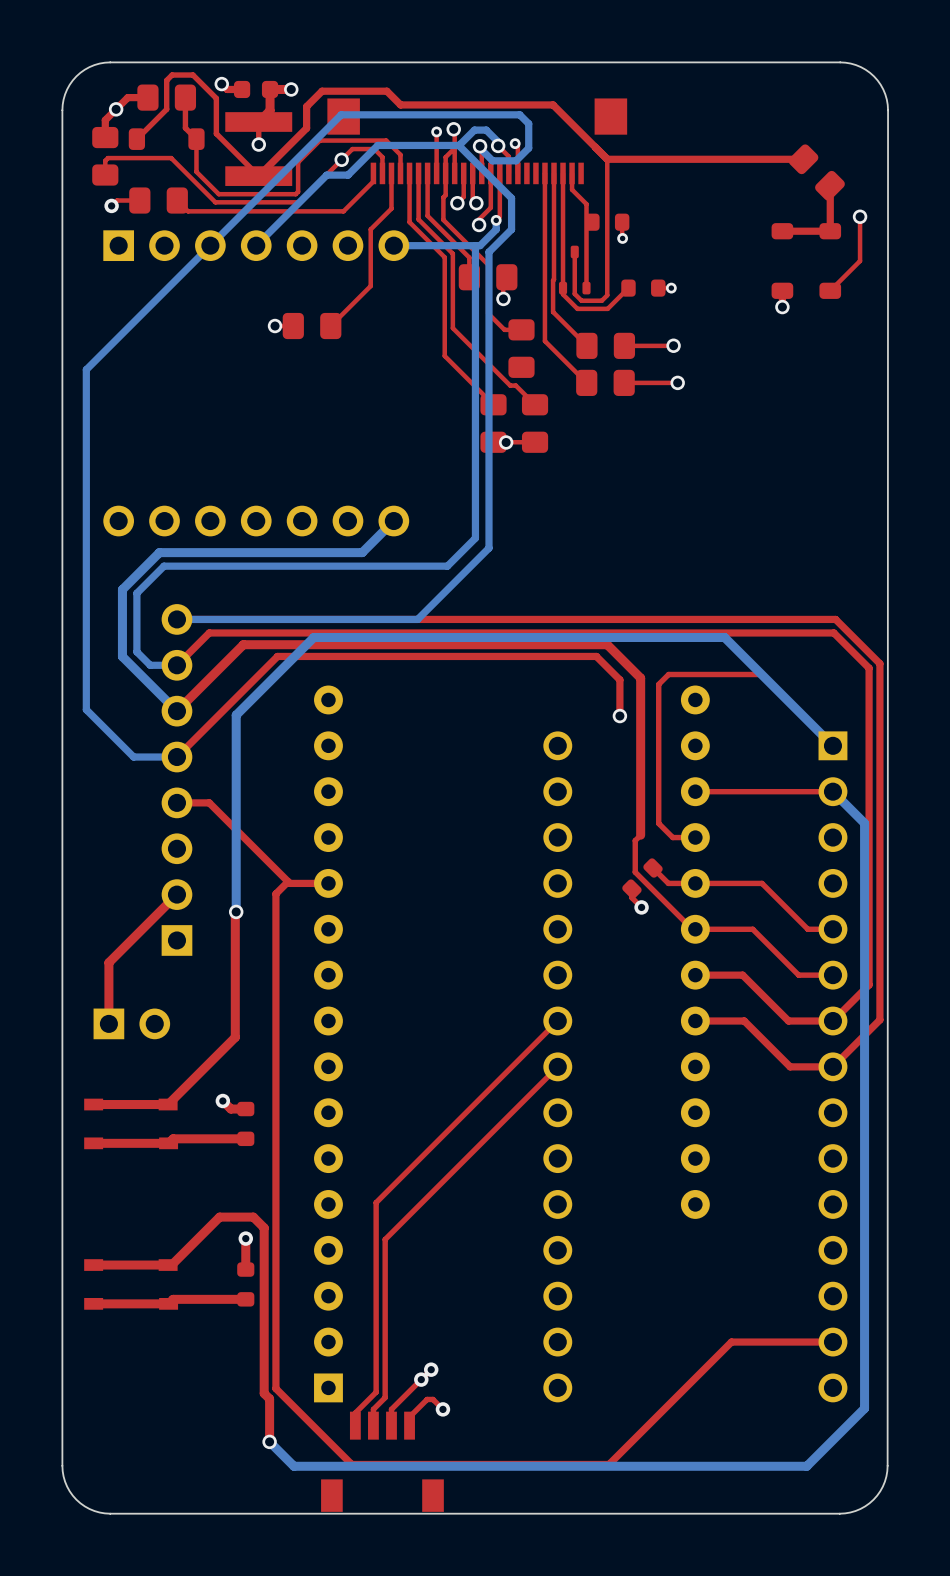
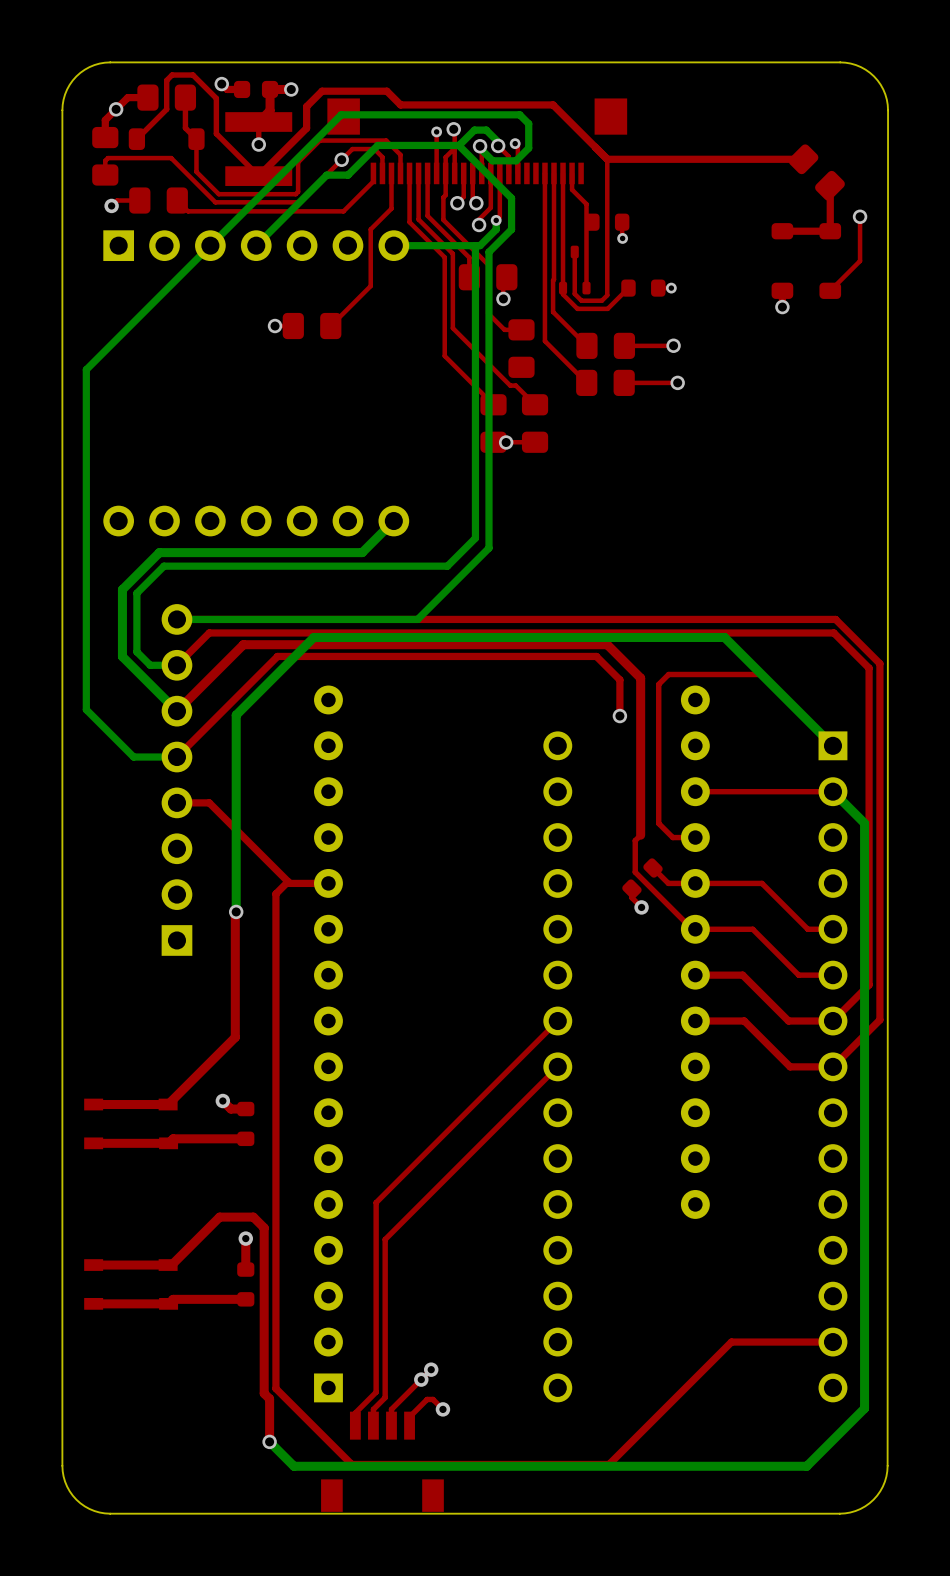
top track: (176, 894) (108, 962) (108, 1023) -> none
part: (131, 1023) -> none

